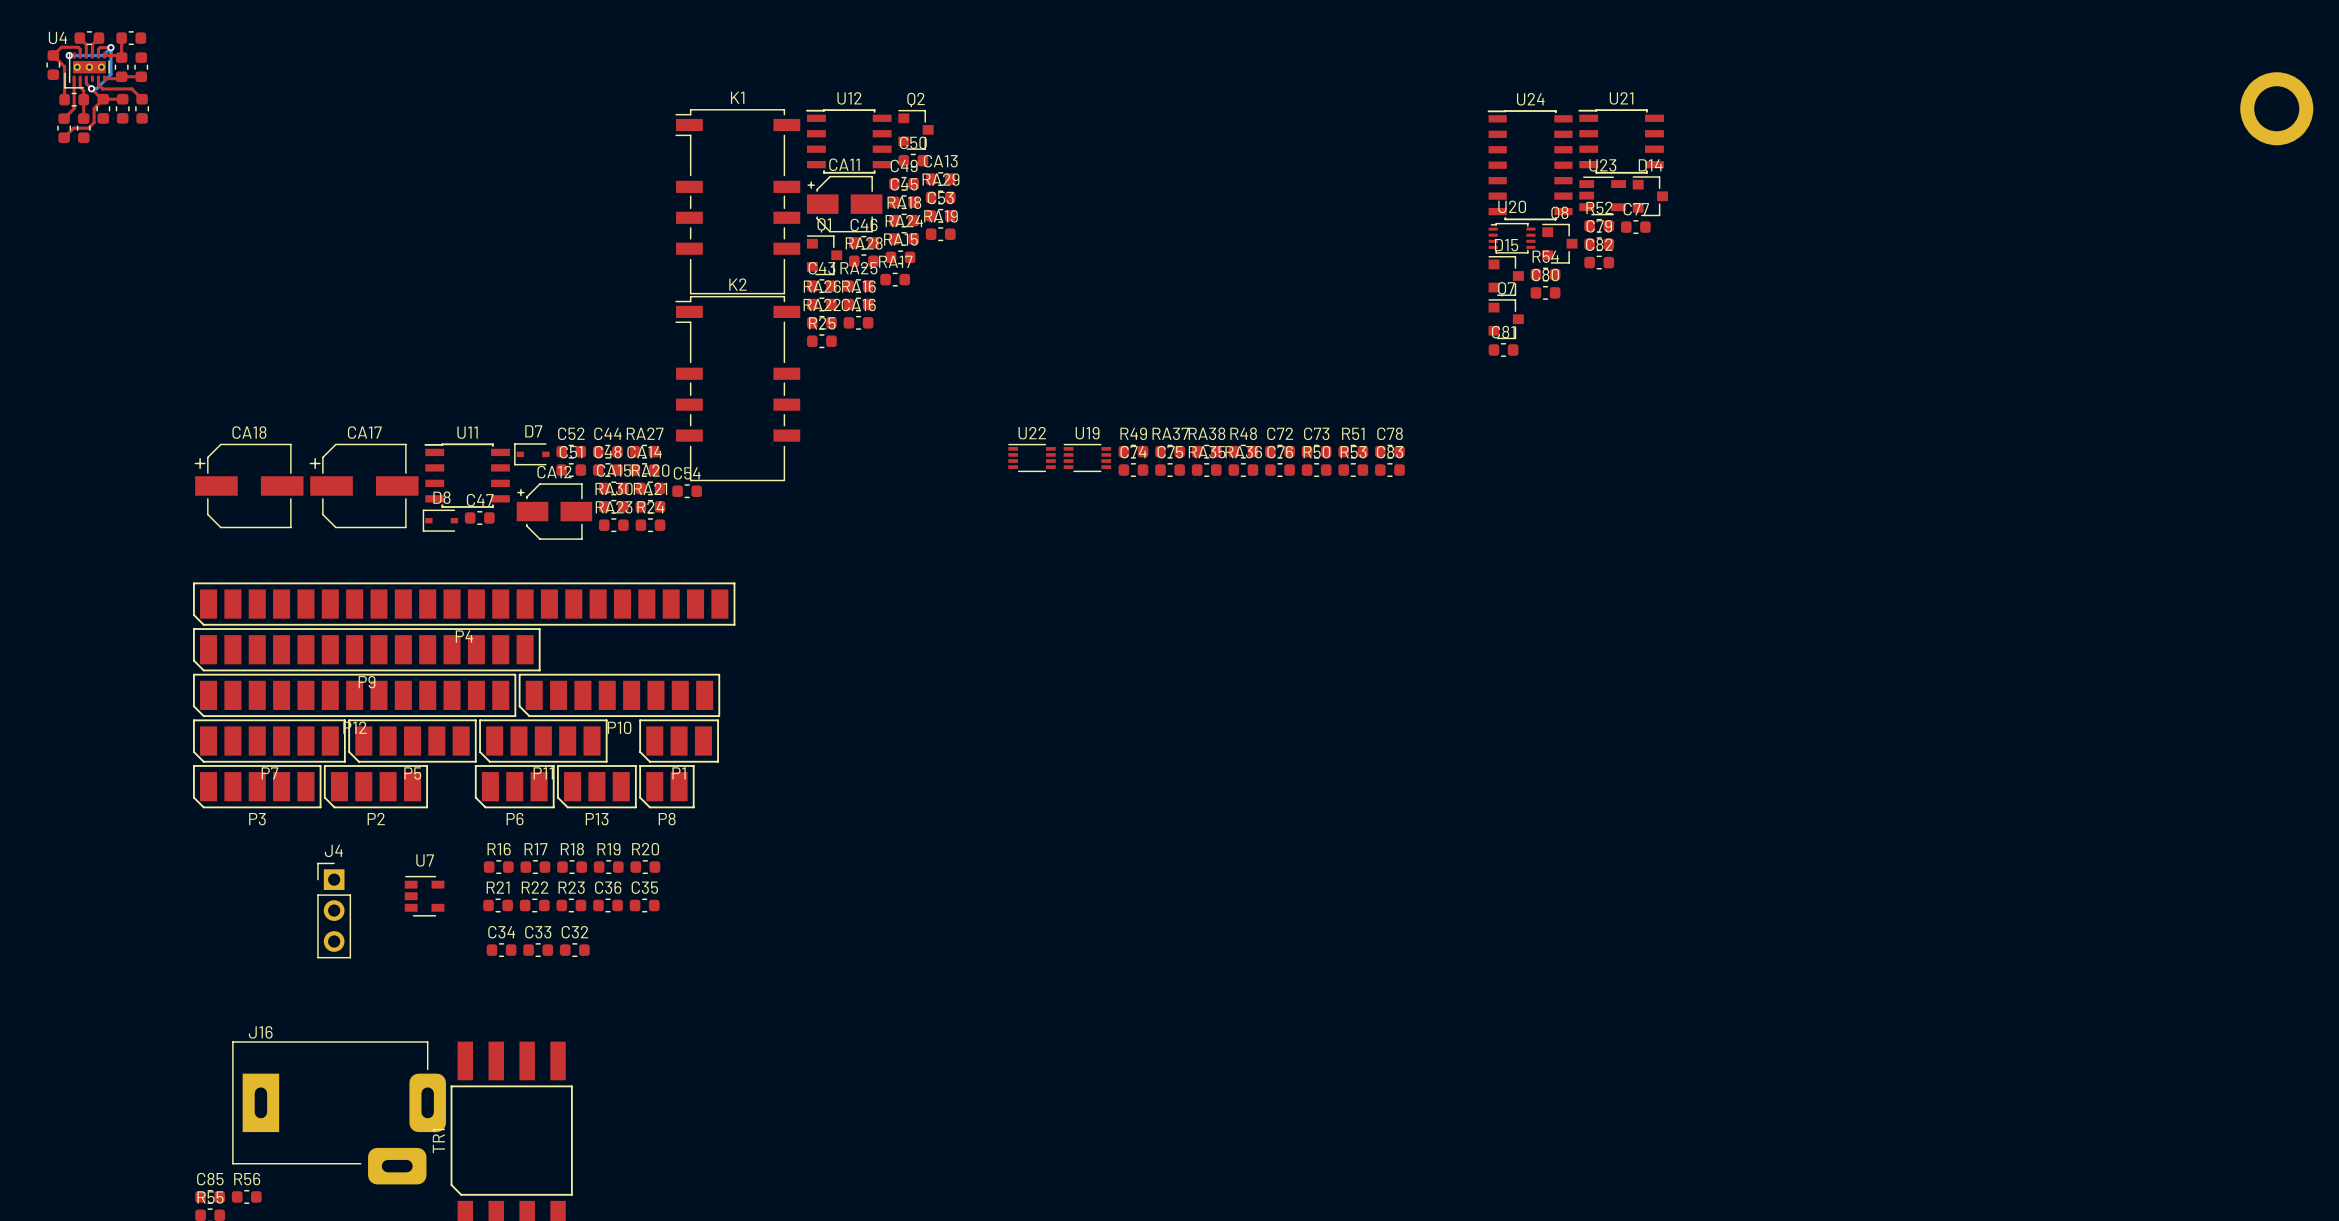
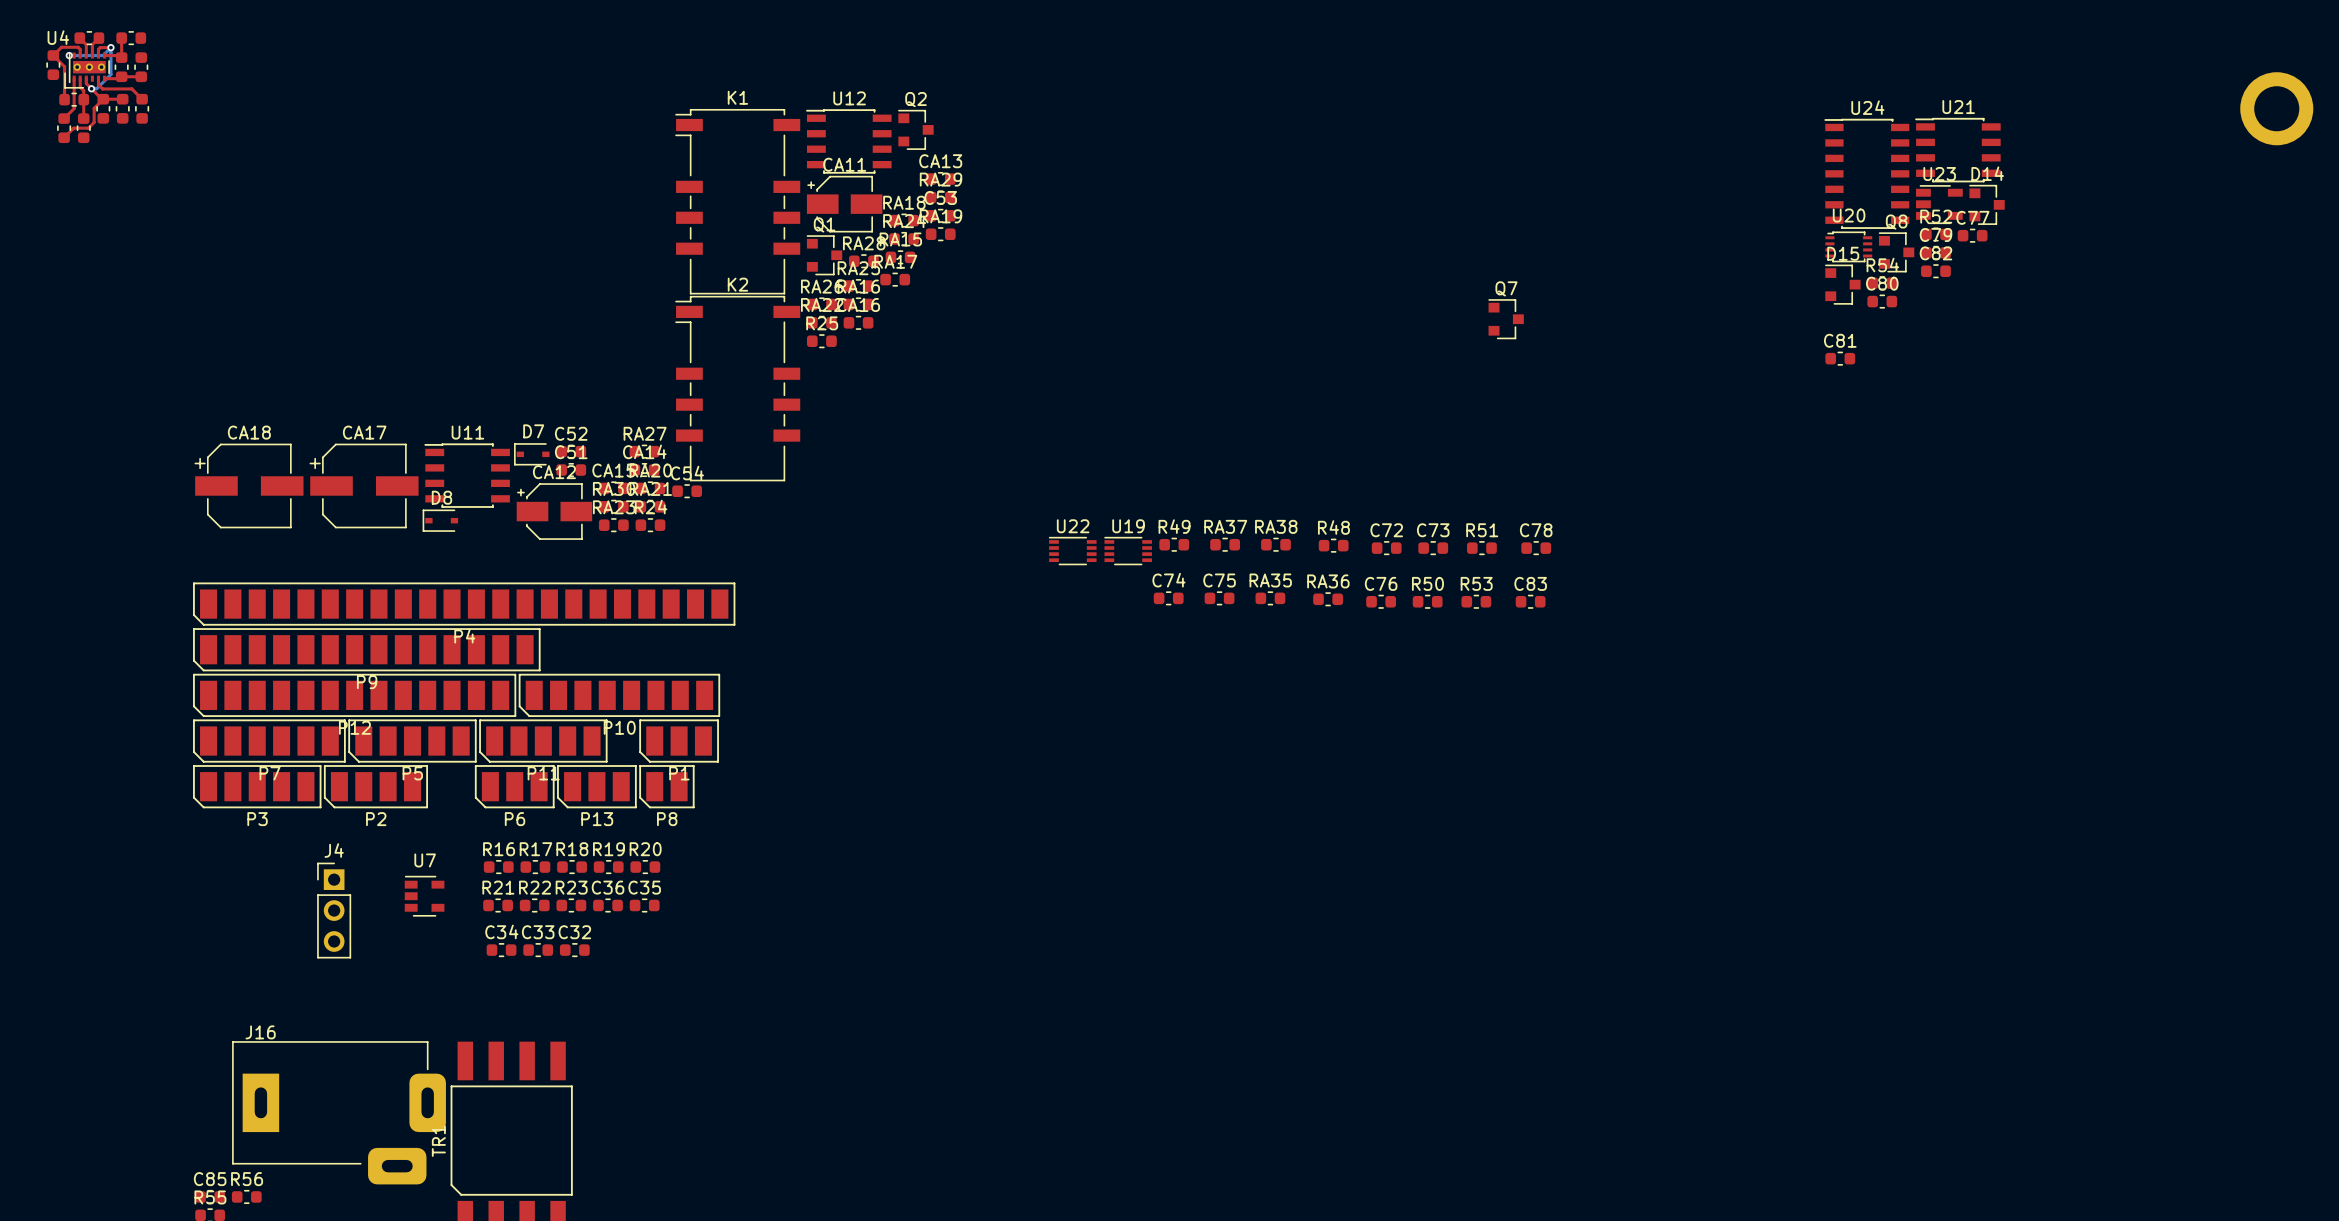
U21 position: (1621, 141) -> (1957, 150)
C50: (913, 160) -> none
U24 position: (1530, 165) -> (1866, 173)
C49: (904, 183) -> none
U23 position: (1602, 195) -> (1939, 204)
D14 position: (1650, 196) -> (1987, 204)
C45: (904, 202) -> none
R52 position: (1599, 225) -> (1935, 234)
C77 position: (1635, 227) -> (1972, 235)
U20 position: (1512, 238) -> (1848, 246)
C46: (863, 242) -> none
Q8 position: (1559, 243) -> (1896, 252)
C79 position: (1599, 244) -> (1935, 252)
C82 position: (1599, 262) -> (1935, 271)
R54 position: (1545, 274) -> (1882, 283)
D15 position: (1506, 275) -> (1842, 284)
C43: (821, 286) -> none
C80 position: (1545, 292) -> (1882, 301)
C81 position: (1503, 349) -> (1840, 358)
C44: (607, 451) -> none
R49 position: (1133, 451) -> (1174, 544)
RA37 position: (1170, 451) -> (1225, 544)
RA38 position: (1206, 451) -> (1275, 544)
R48 position: (1243, 451) -> (1333, 545)
C72 position: (1280, 451) -> (1386, 548)
C73 position: (1316, 451) -> (1433, 548)
R51 position: (1353, 451) -> (1481, 548)
C78 position: (1389, 451) -> (1536, 548)
U22 position: (1031, 457) -> (1072, 551)
U19 position: (1087, 457) -> (1128, 551)
C48: (607, 470) -> none
C74 position: (1133, 470) -> (1168, 598)
C75 position: (1170, 470) -> (1219, 598)
RA35 position: (1206, 470) -> (1270, 598)
RA36 position: (1243, 470) -> (1328, 599)
C76 position: (1280, 470) -> (1381, 601)
R50 position: (1316, 470) -> (1427, 601)
R53 position: (1353, 470) -> (1476, 601)
C83 position: (1389, 470) -> (1530, 601)
C47: (479, 518) -> none

